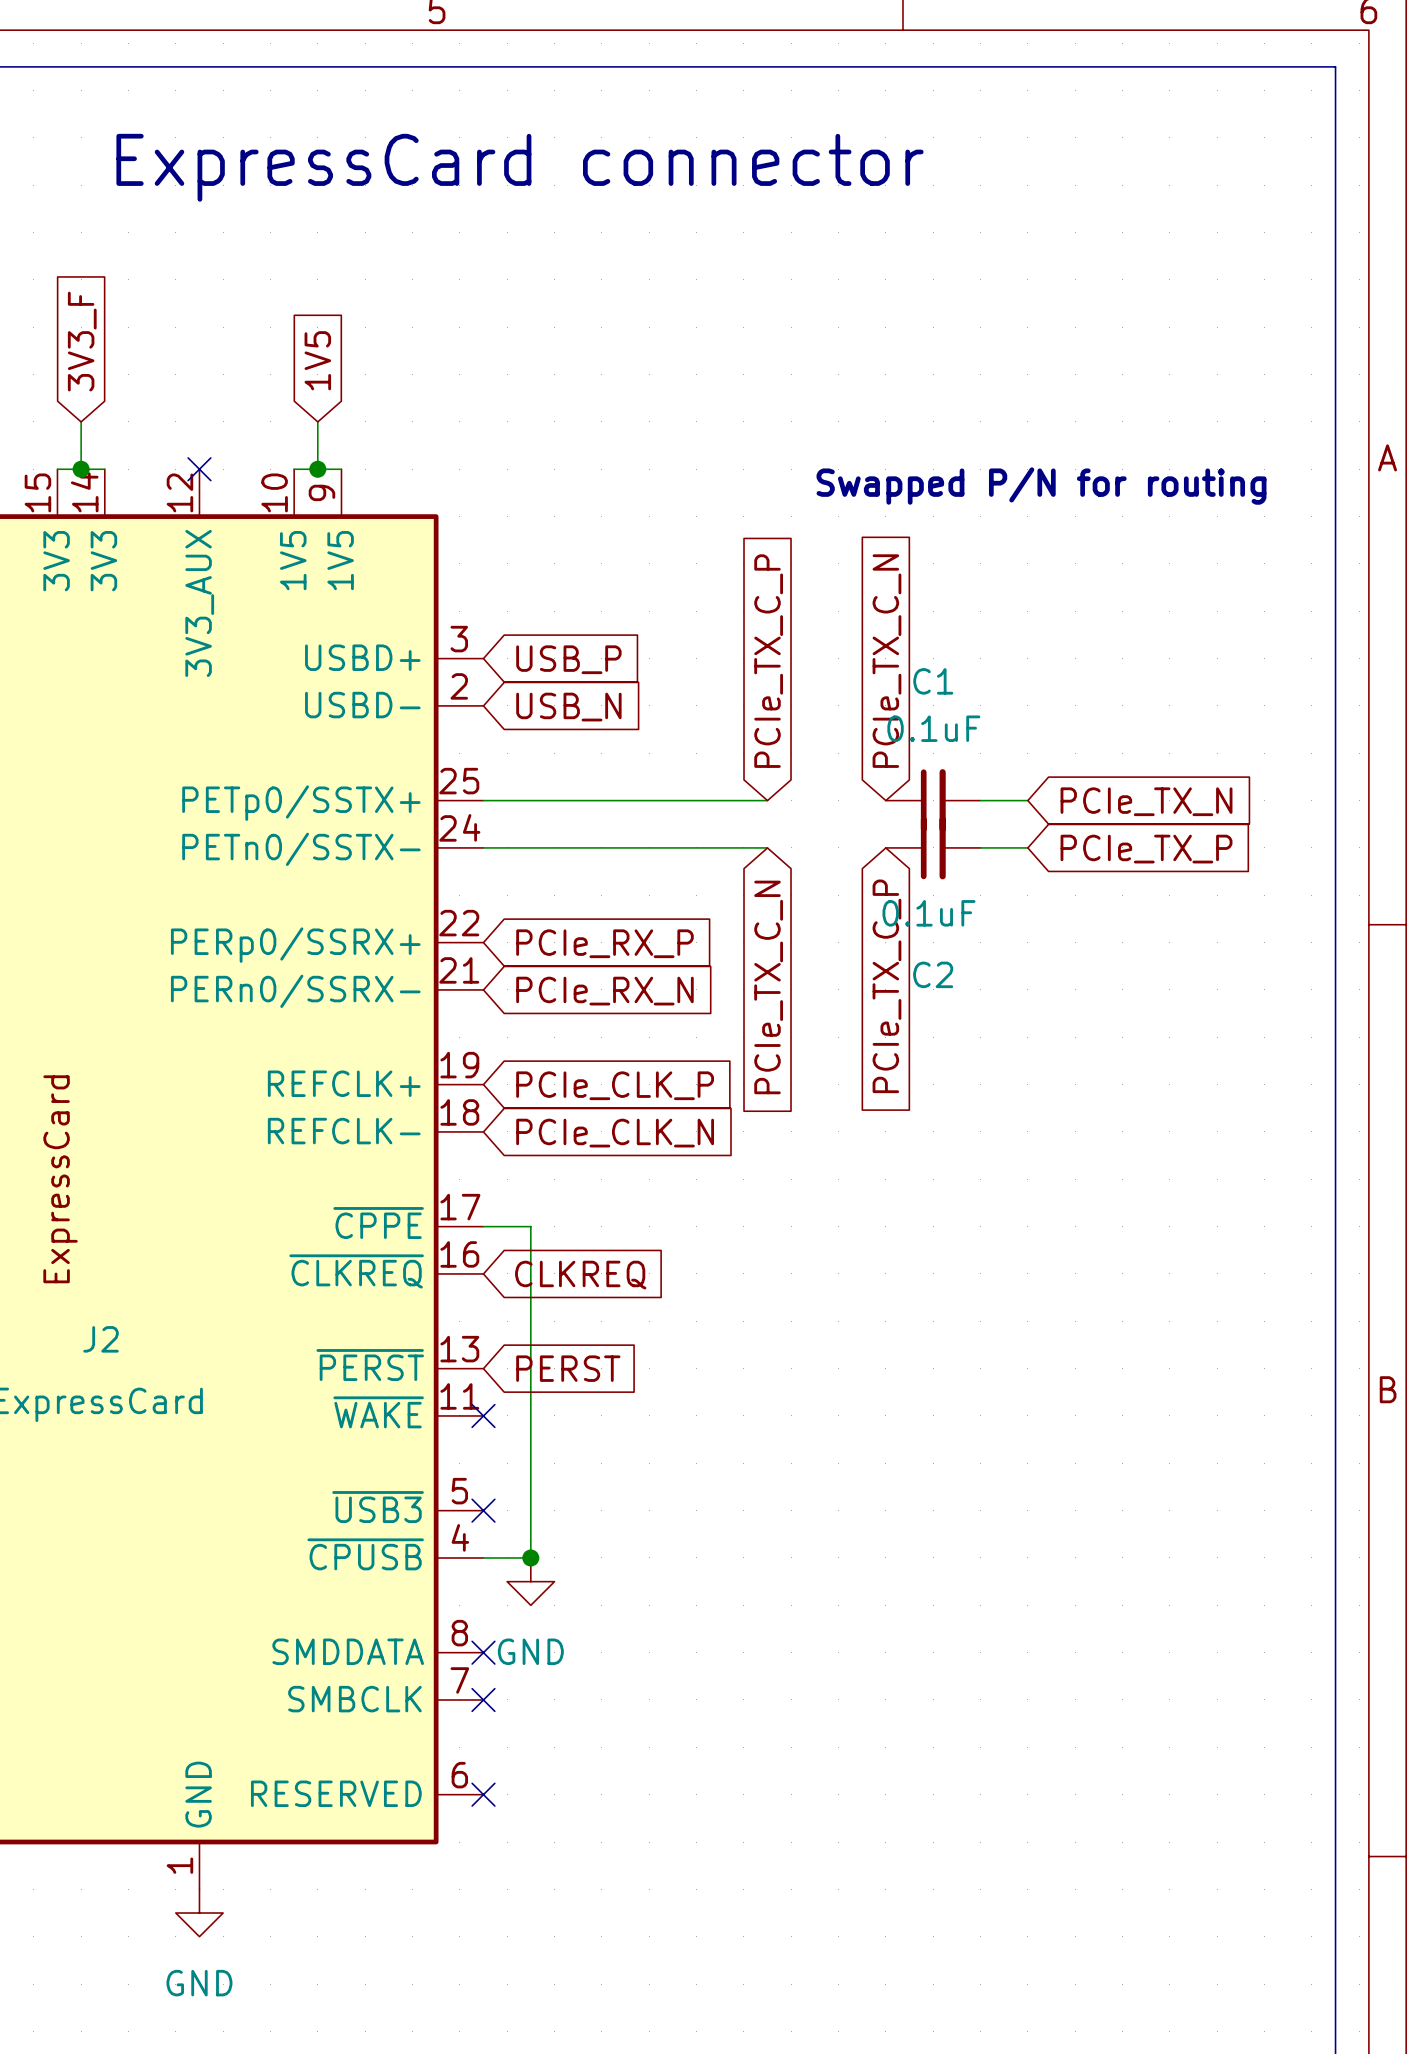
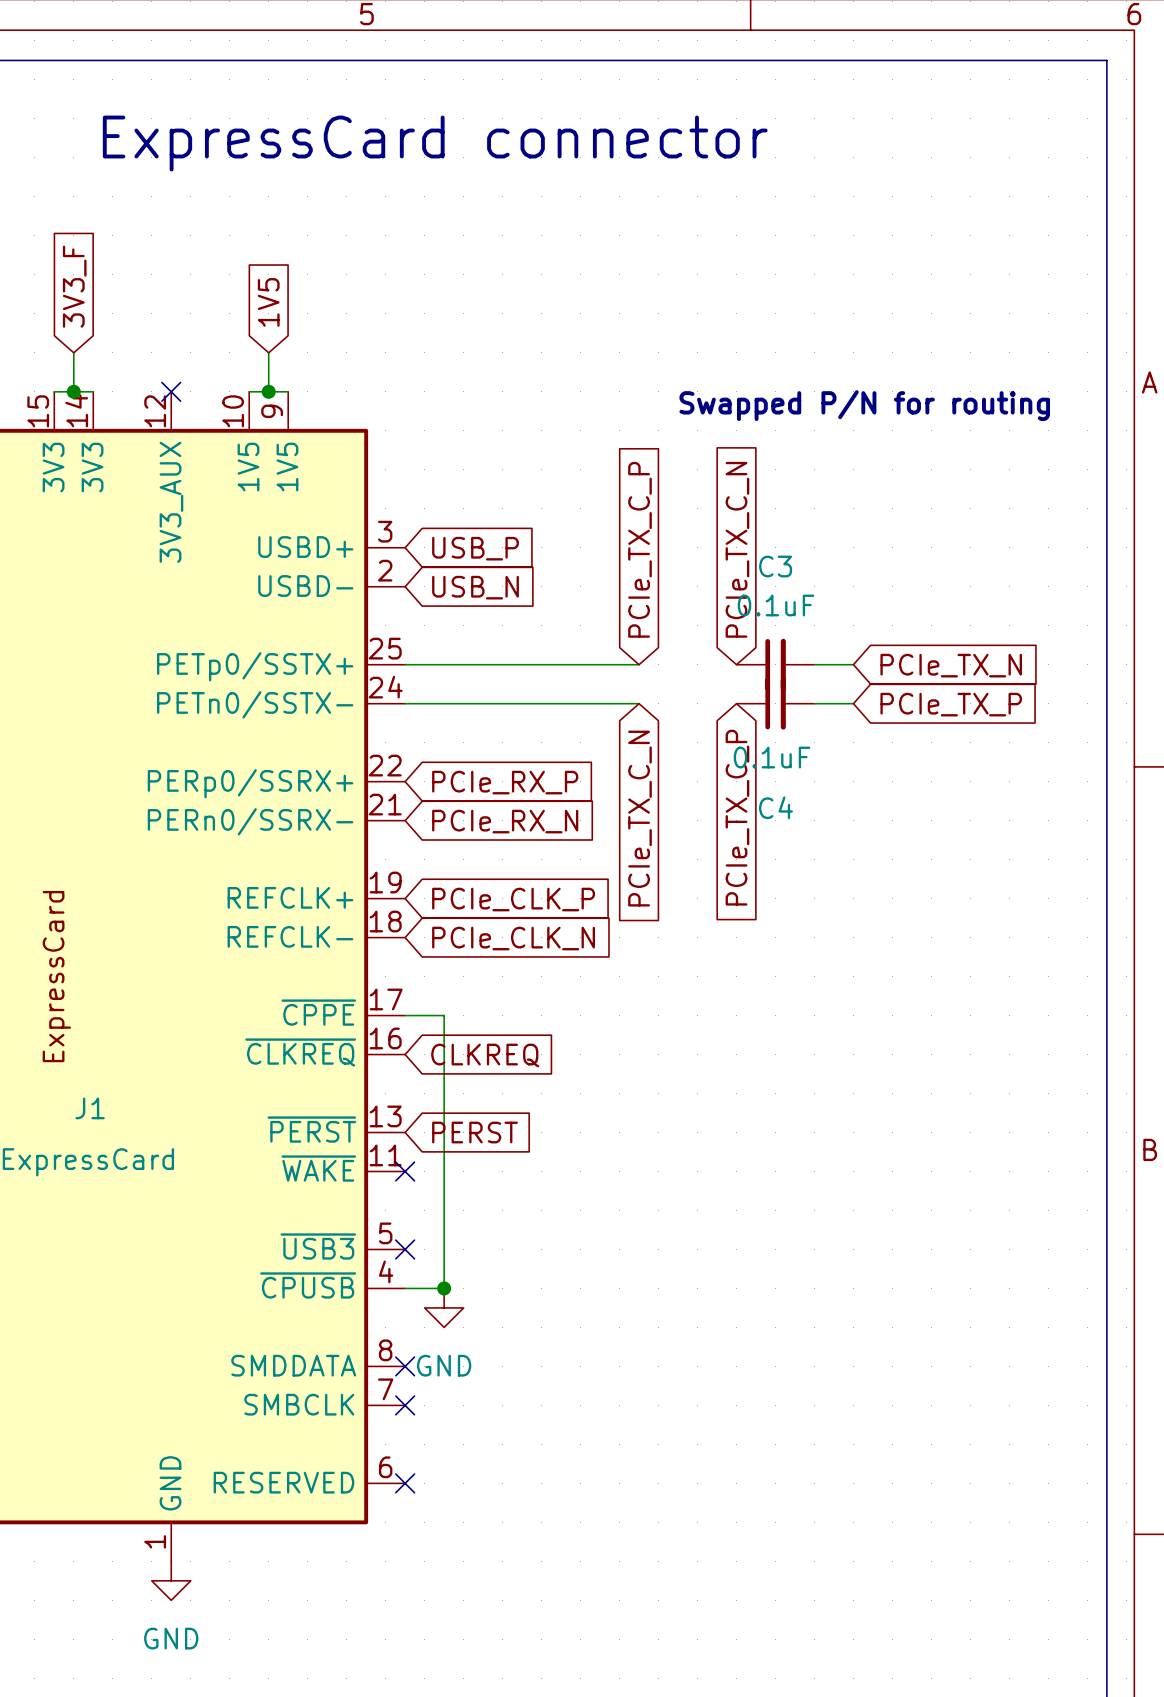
C1 name: C1 (933, 681) -> C3 (775, 566)
C2 name: C2 (933, 974) -> C4 (775, 807)
J2 name: J2 (101, 1339) -> J1 (90, 1108)

